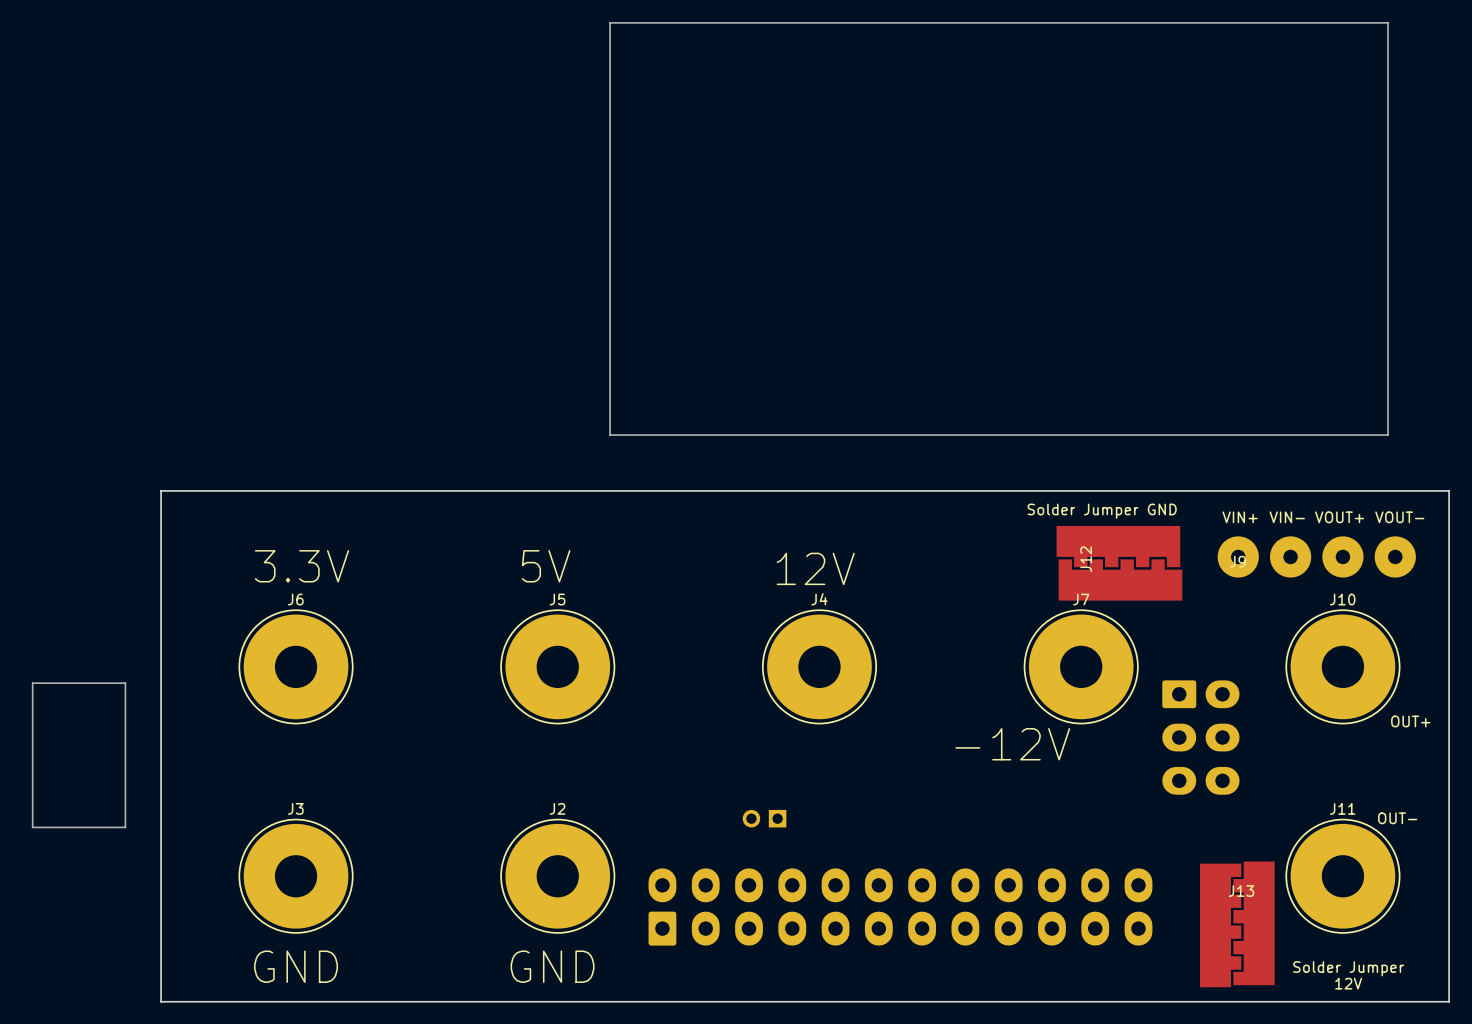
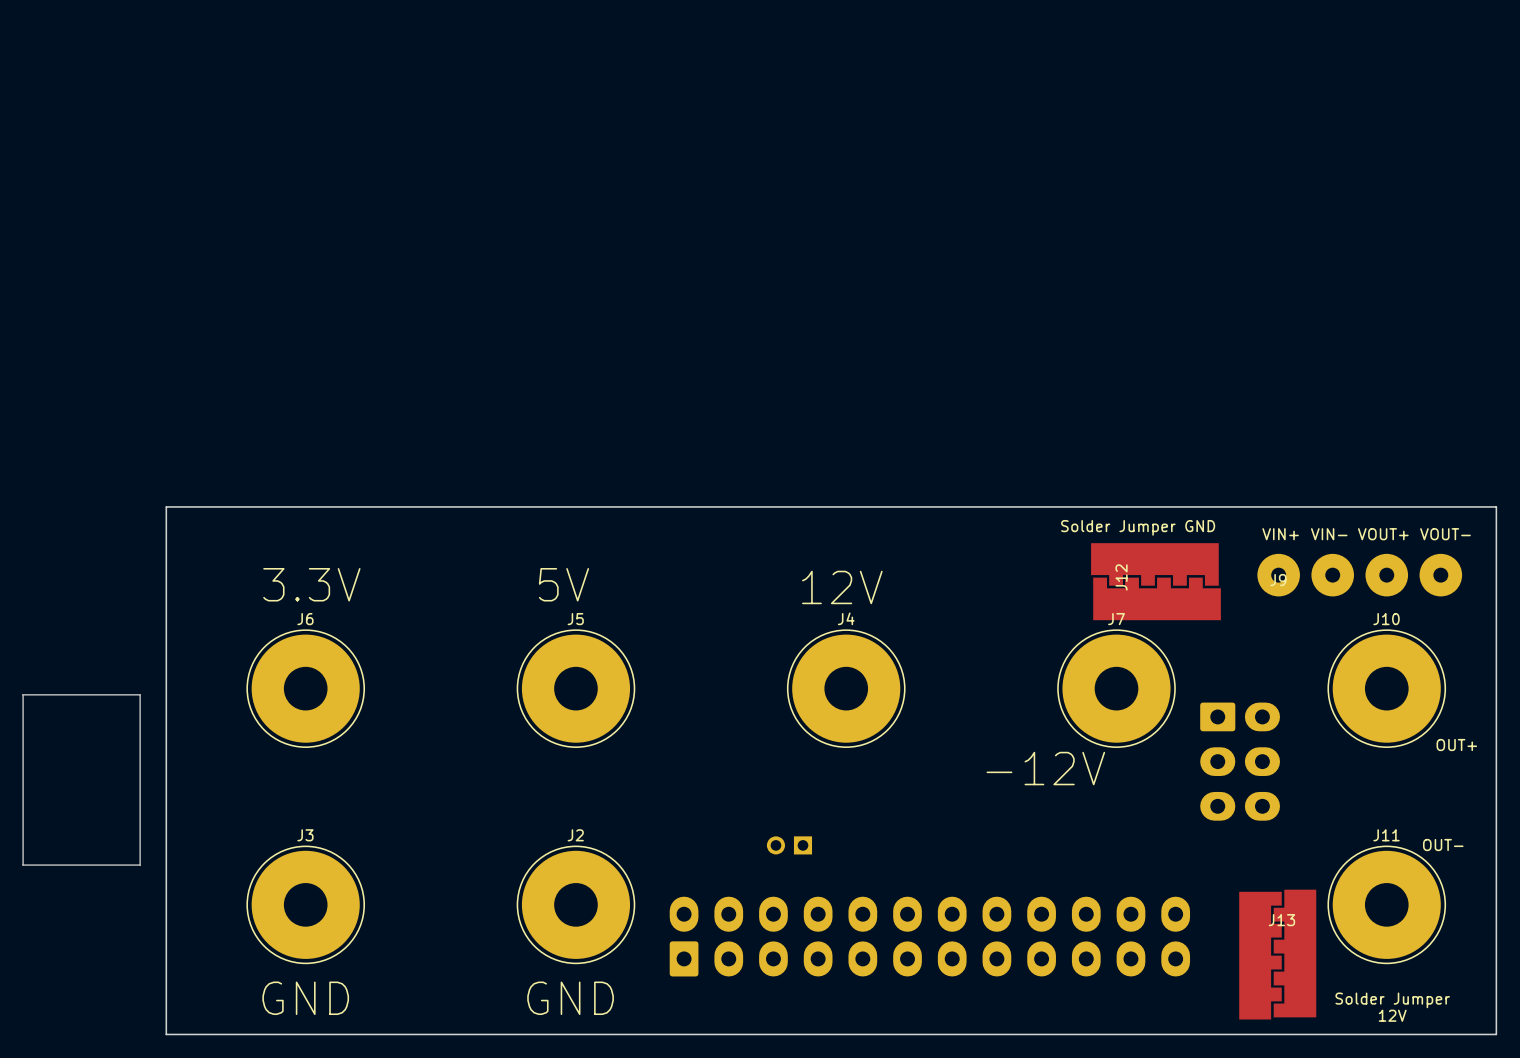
line: (610, 22) (1388, 22) (1388, 435) (610, 435) (610, 22) -> none
line: (32, 683) (125, 683) (125, 827) (32, 827) (32, 683) -> (23, 694) (23, 865) (140, 865) (140, 694) (23, 694)

